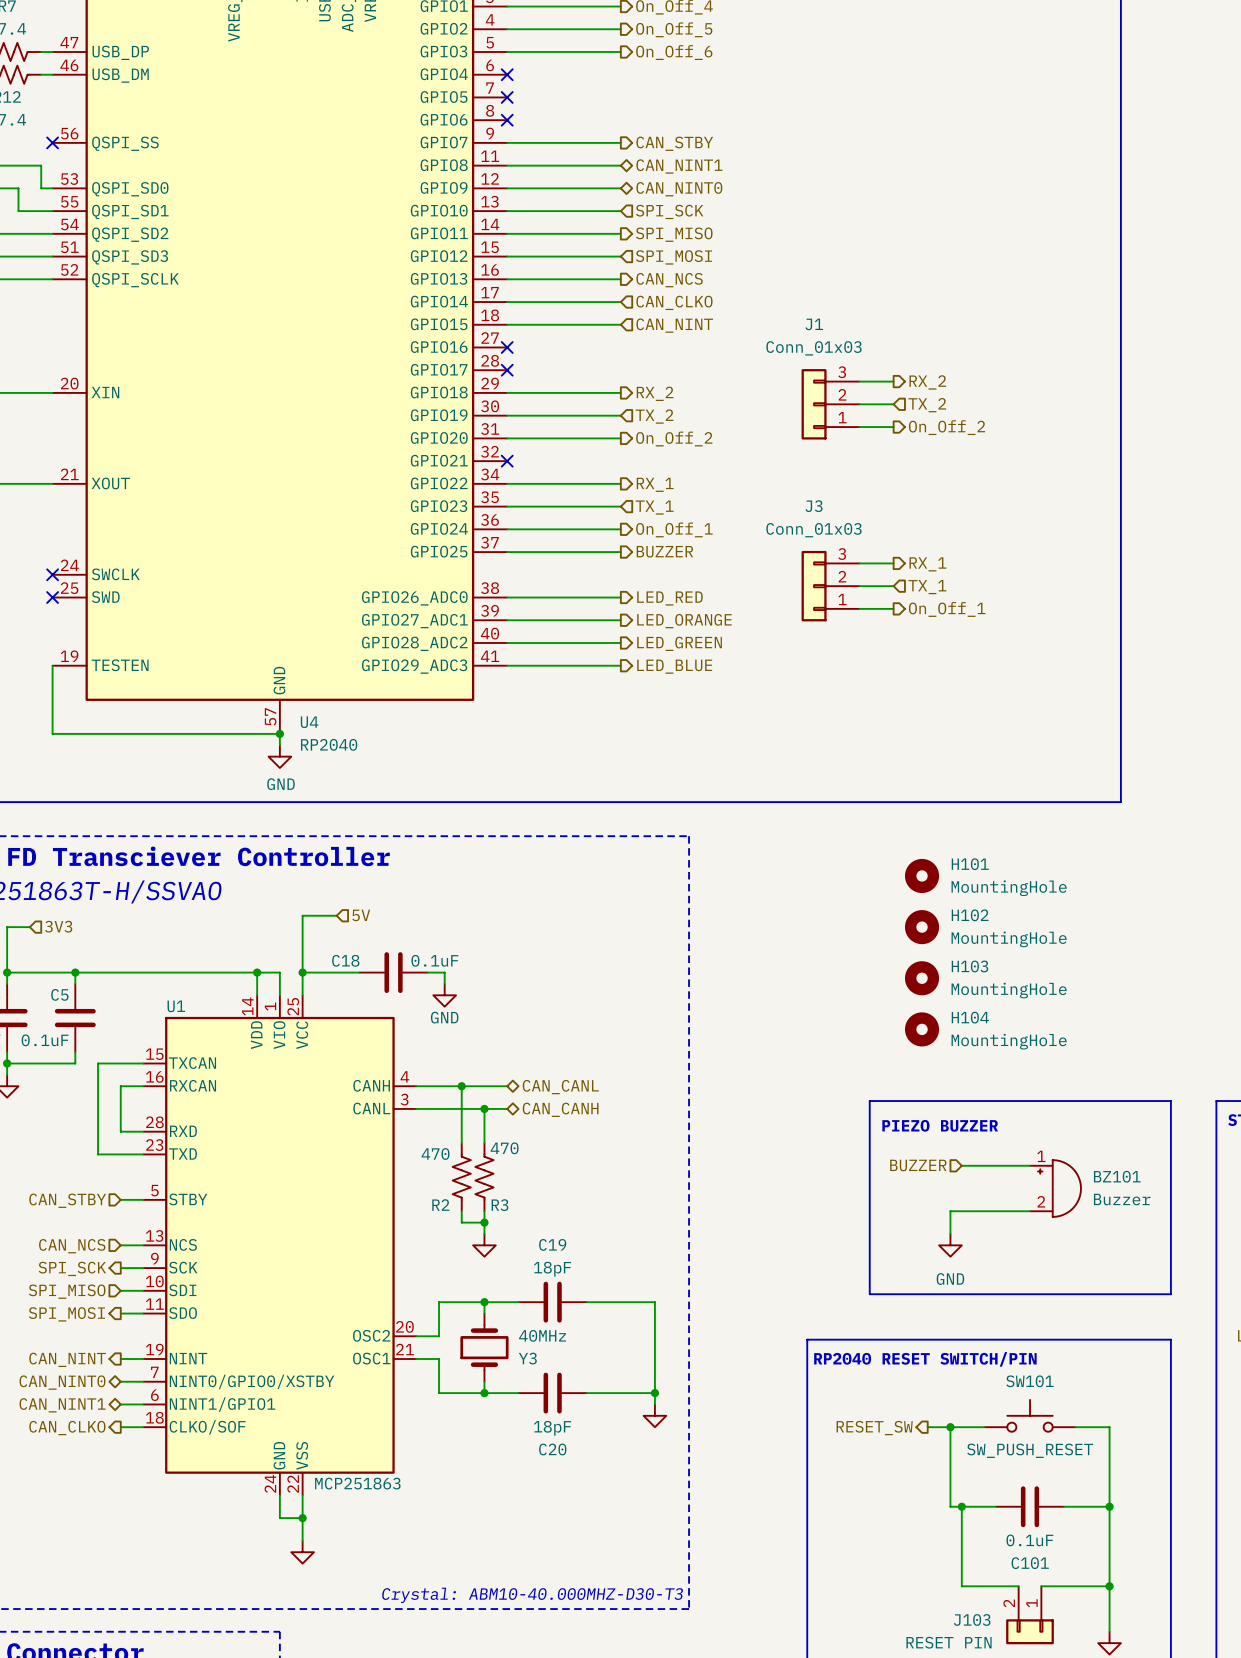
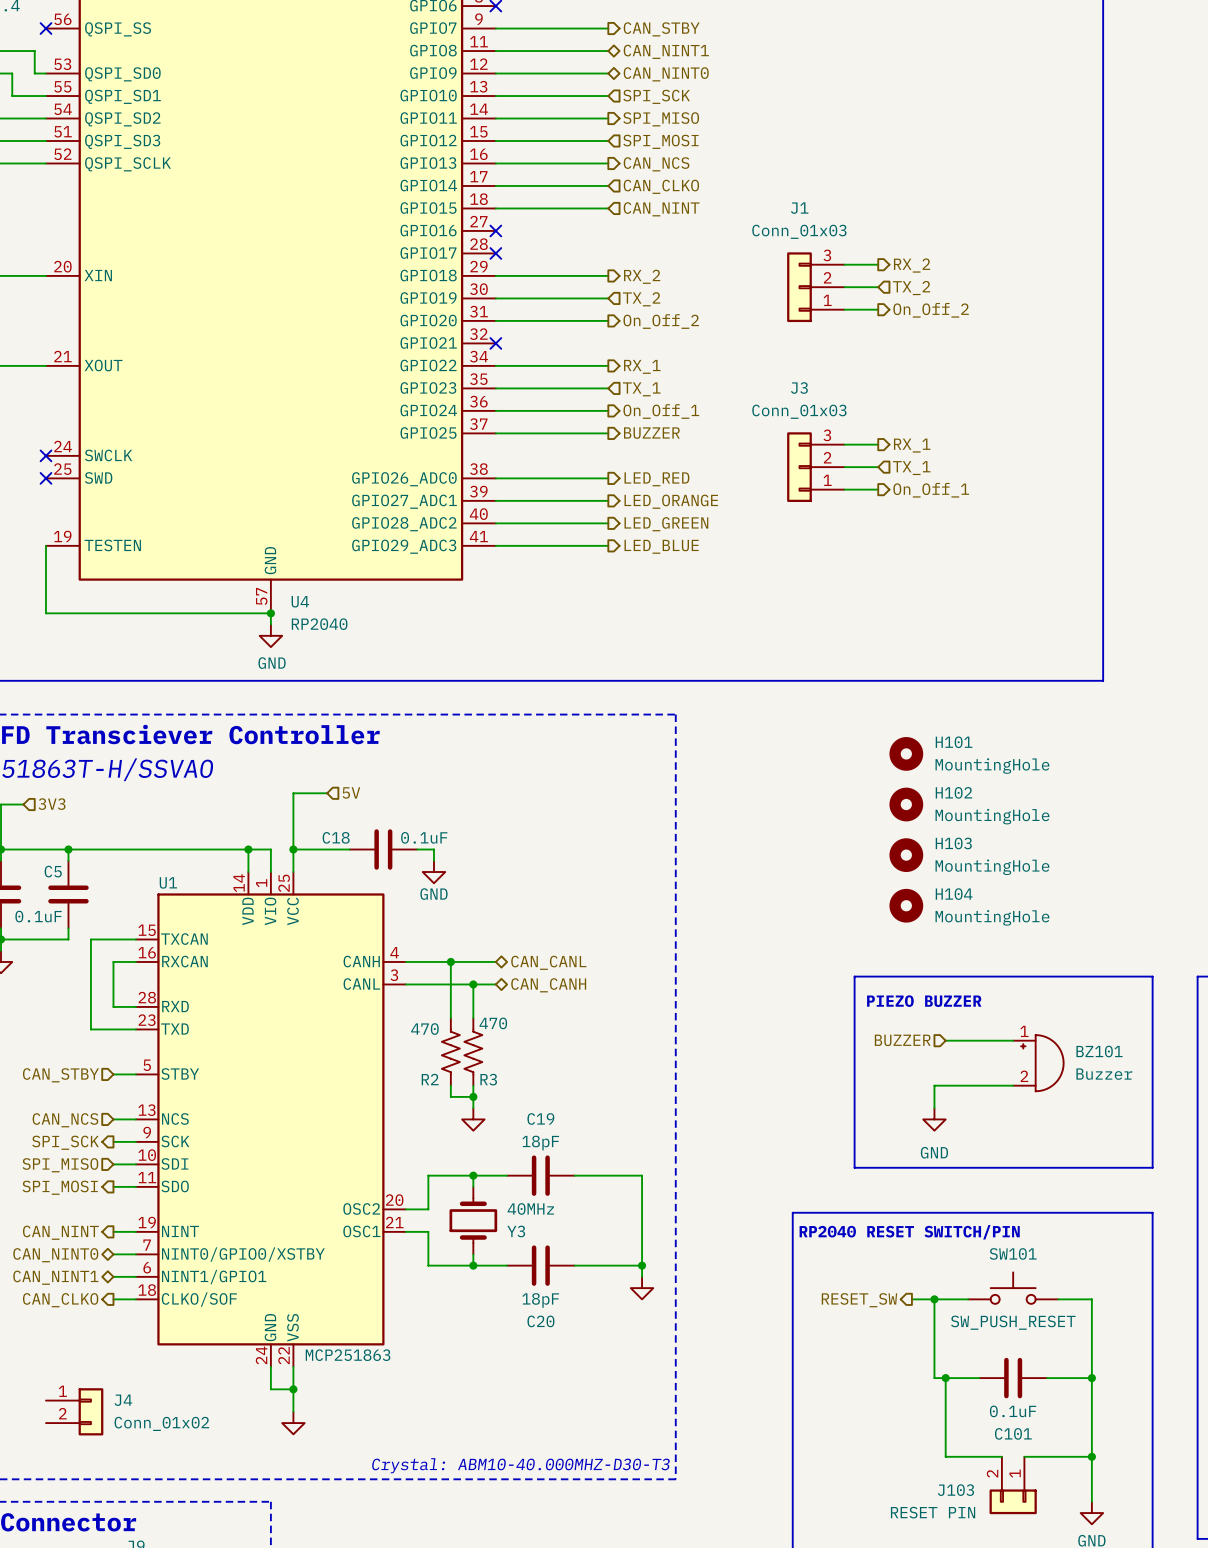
J4: none -> Conn_01x02 (74, 1411)

